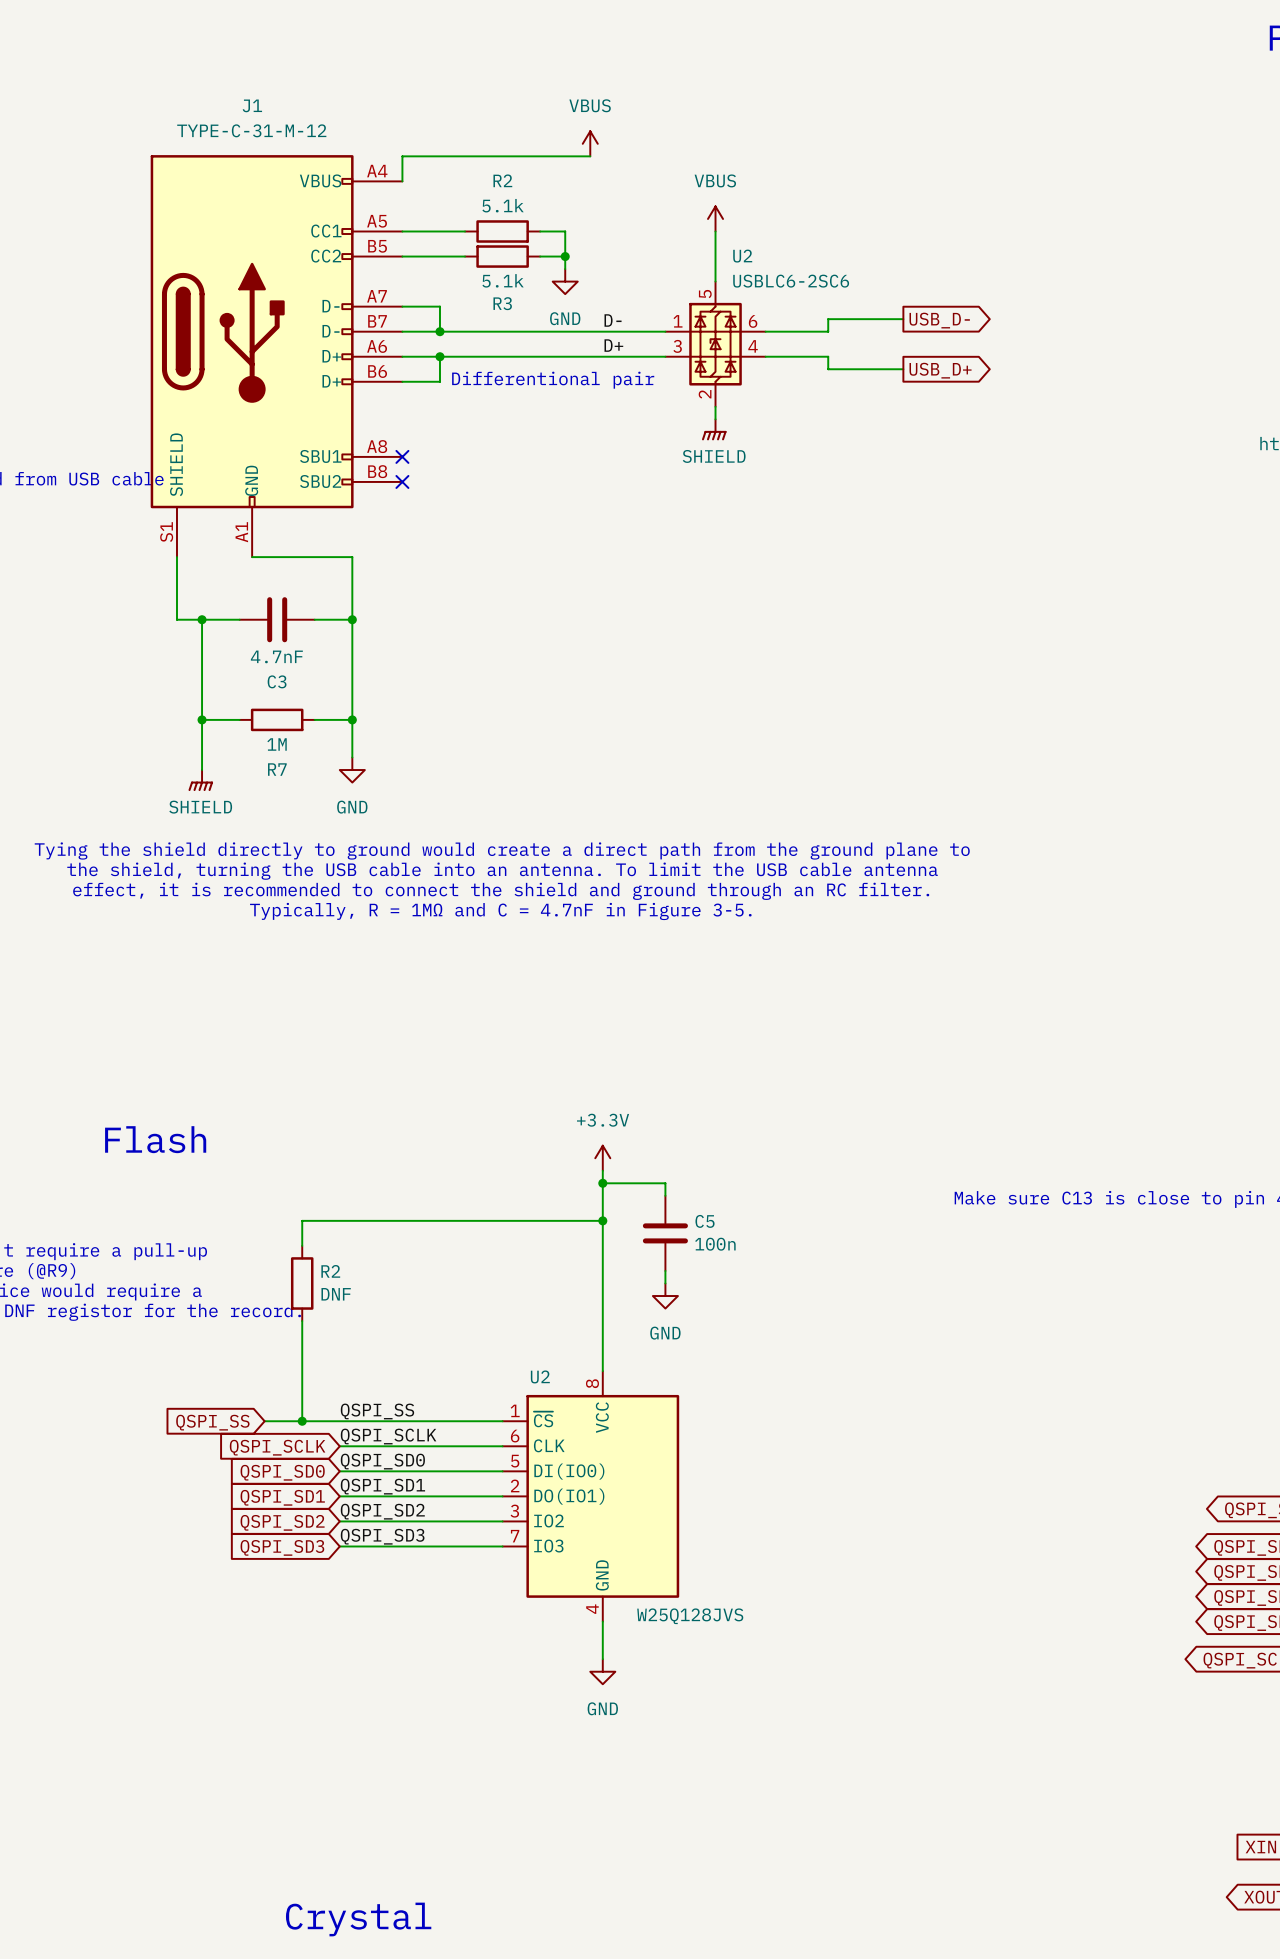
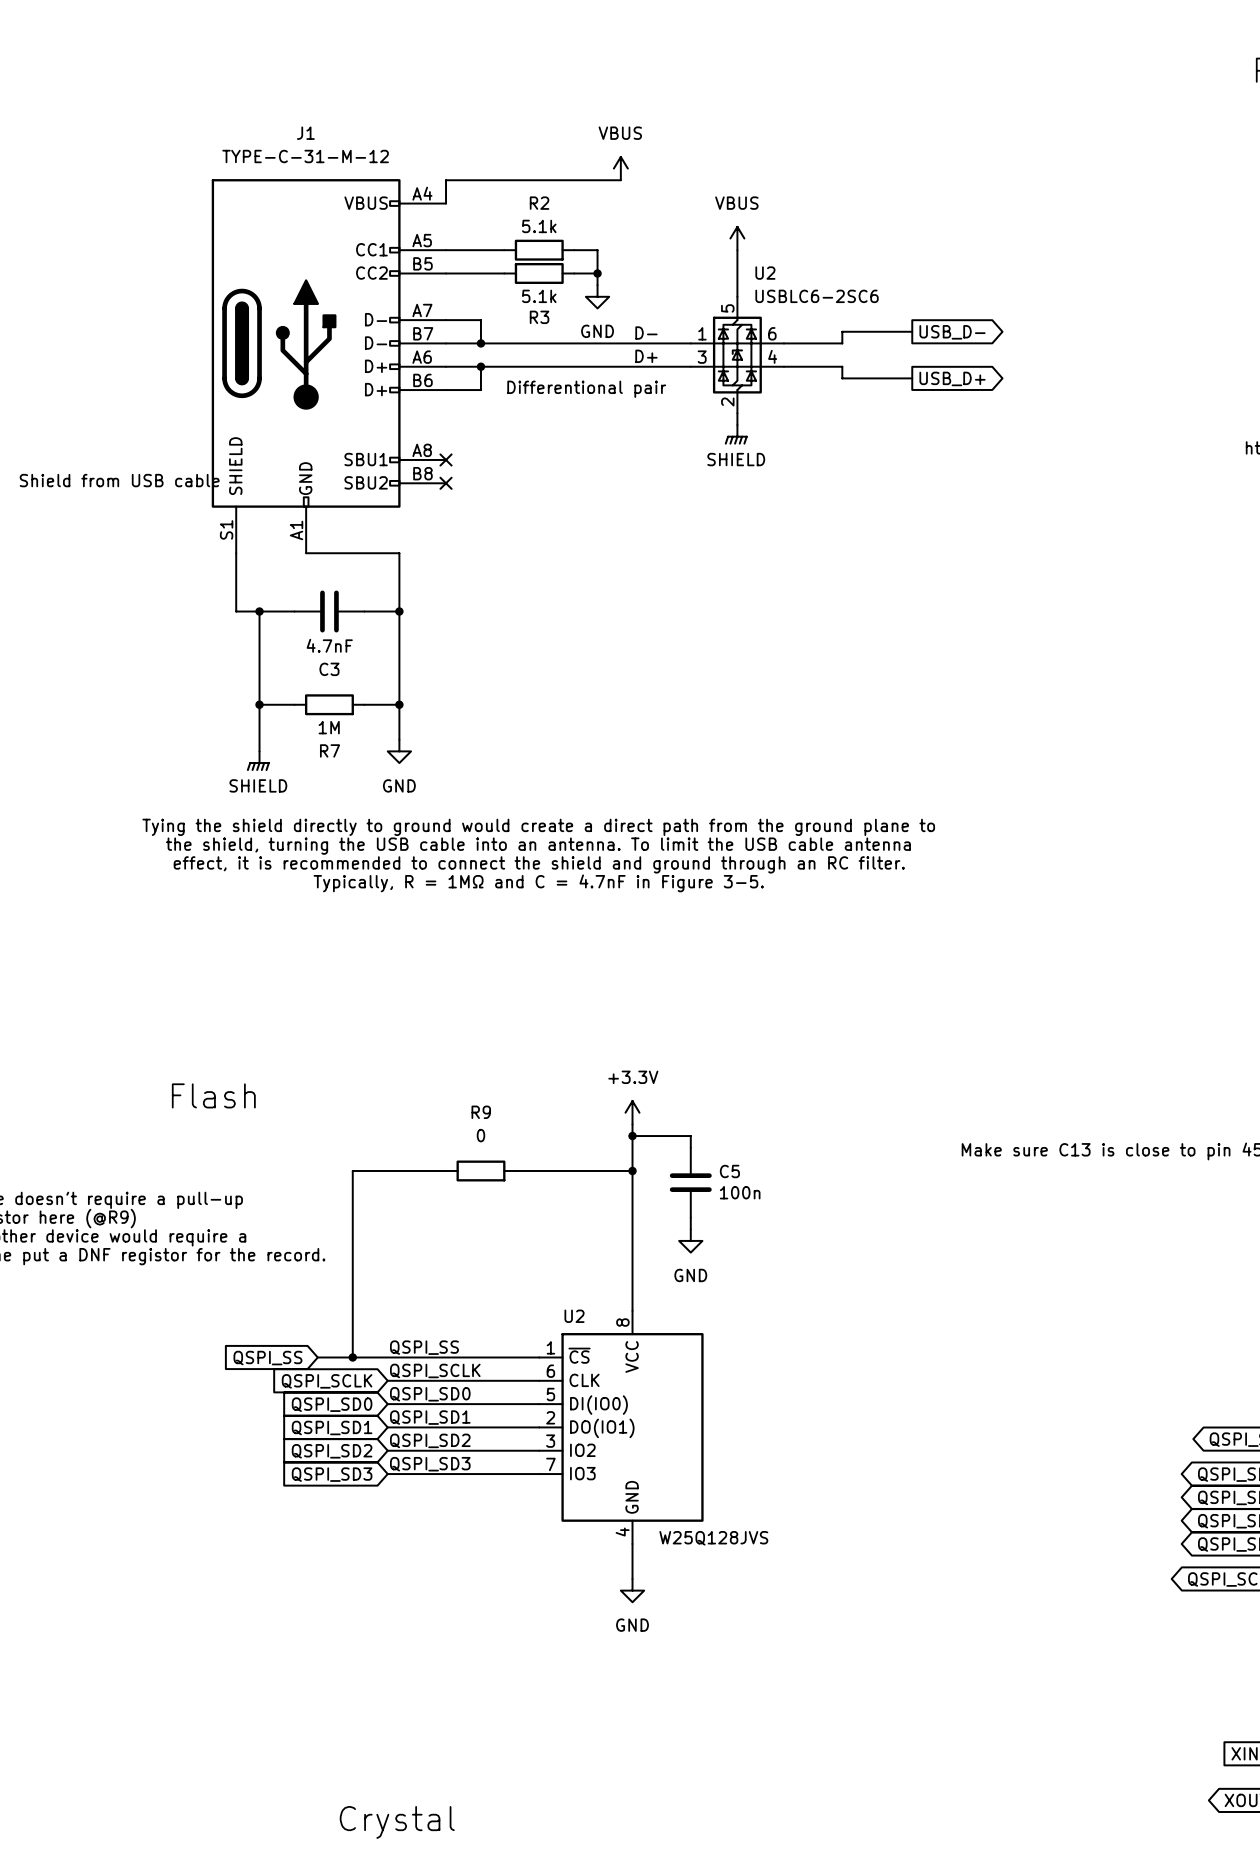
wire: (402, 1220) (477, 1220) -> none
R9: none -> 0 (480, 1170)
wire: none -> (352, 1194) (352, 1264)
R2: DNF (302, 1283) -> none

